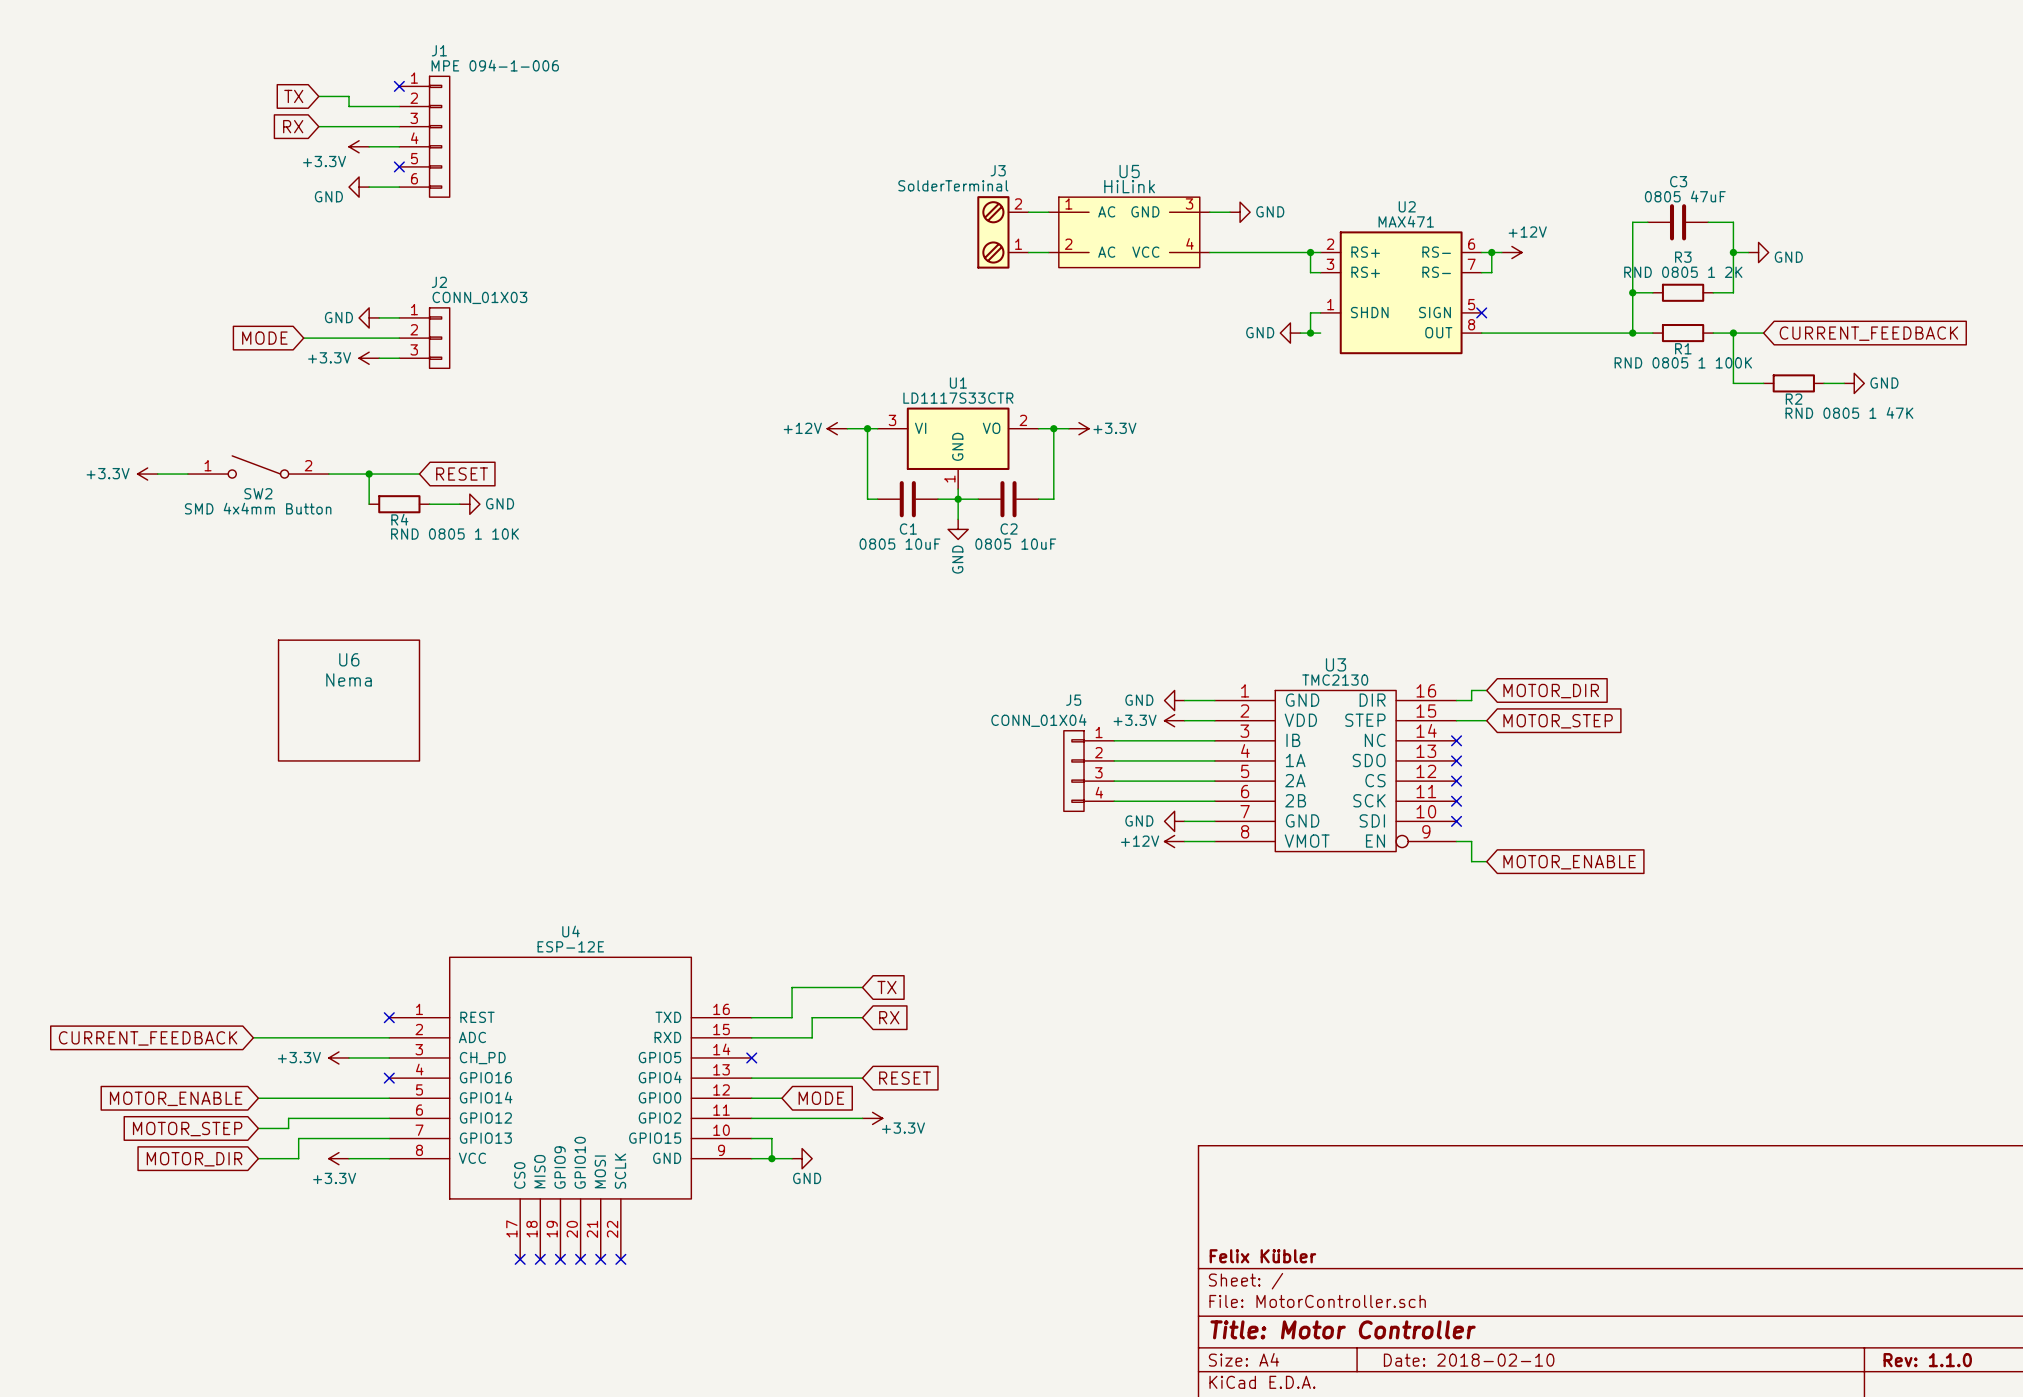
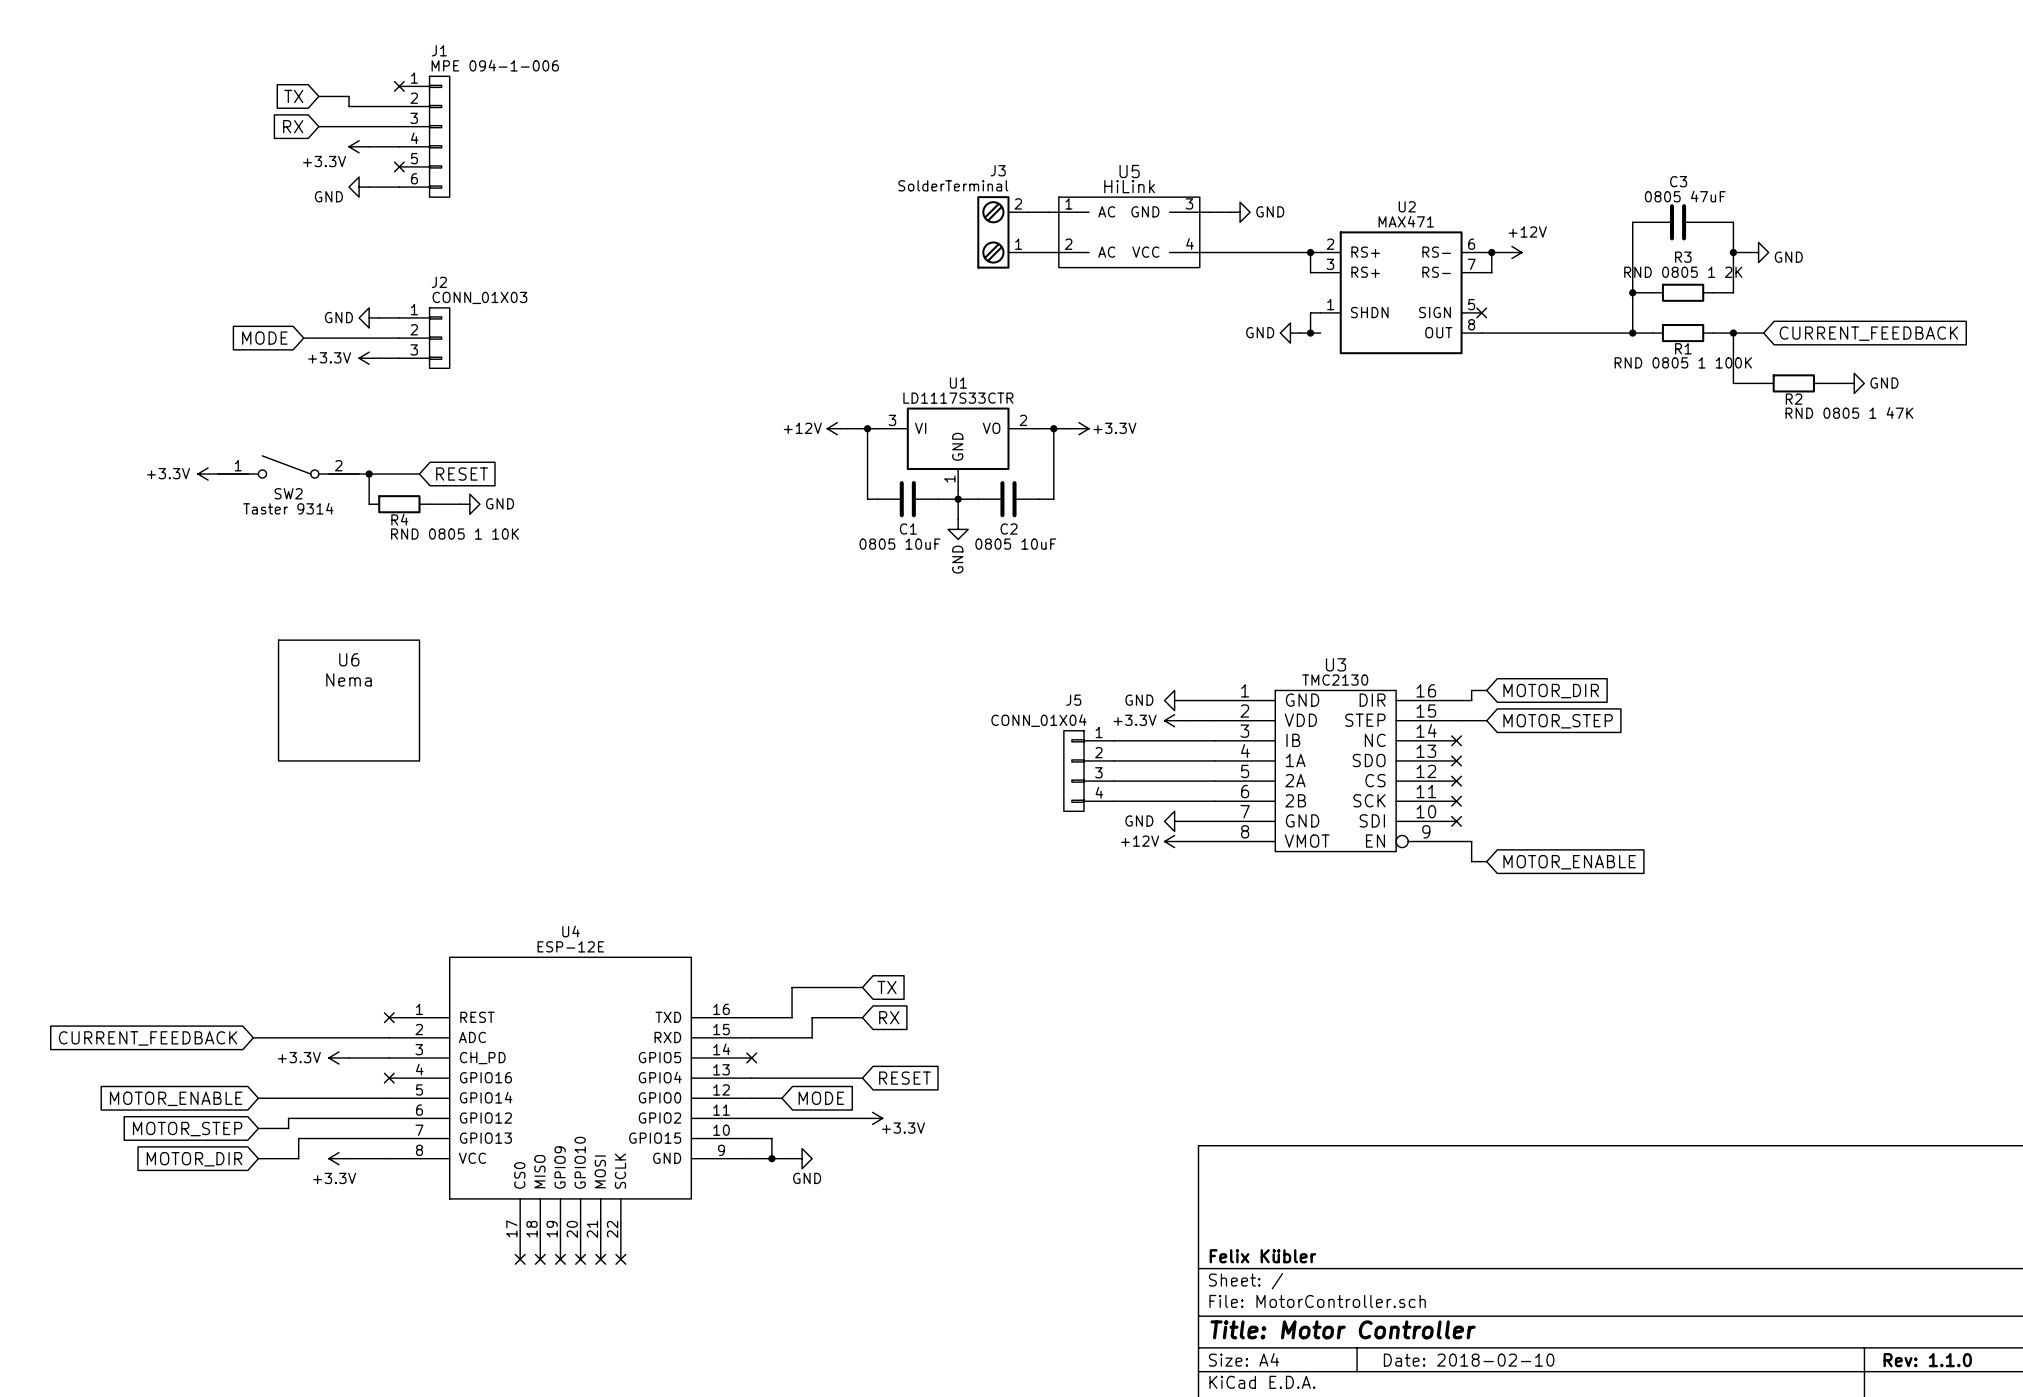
SW2 position: (258, 466) -> (288, 466)
power symbol position: +3.3V (147, 474) -> +3.3V (208, 474)
wire: (157, 474) (187, 474) -> (218, 474) (248, 474)
SW2 value: SMD 4x4mm Button (258, 508) -> Taster 9314 (288, 508)

